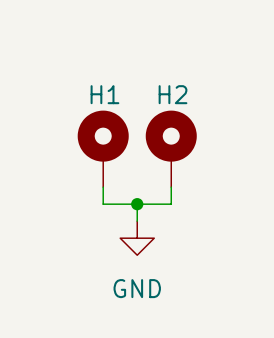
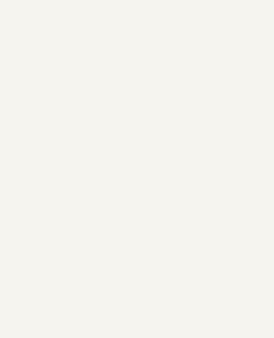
H1: (103, 148) -> none
H2: (171, 148) -> none
wire: (103, 187) (103, 204) (171, 204) (171, 187) -> none
wire: (137, 204) (137, 221) -> none
junction: (137, 204) -> none
power symbol: GND (137, 238) -> none

